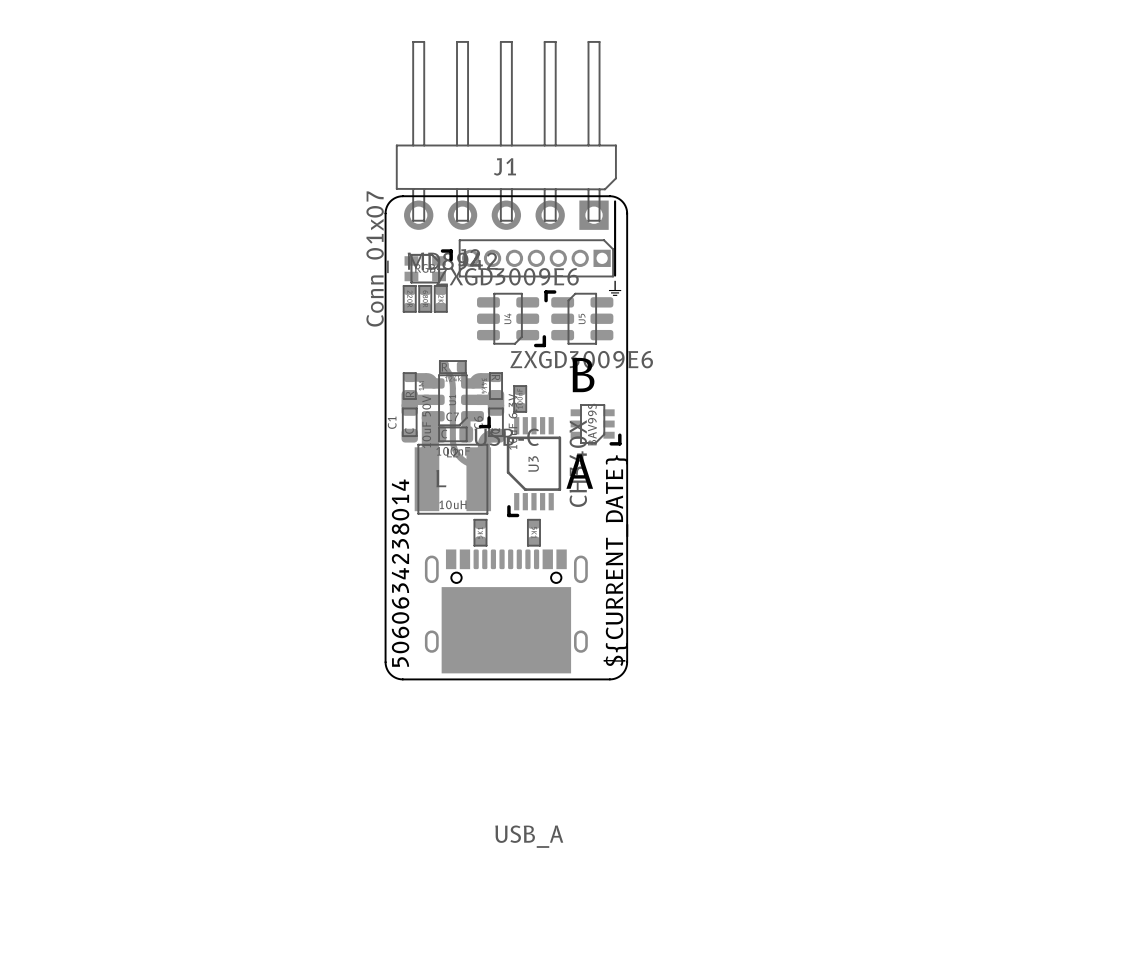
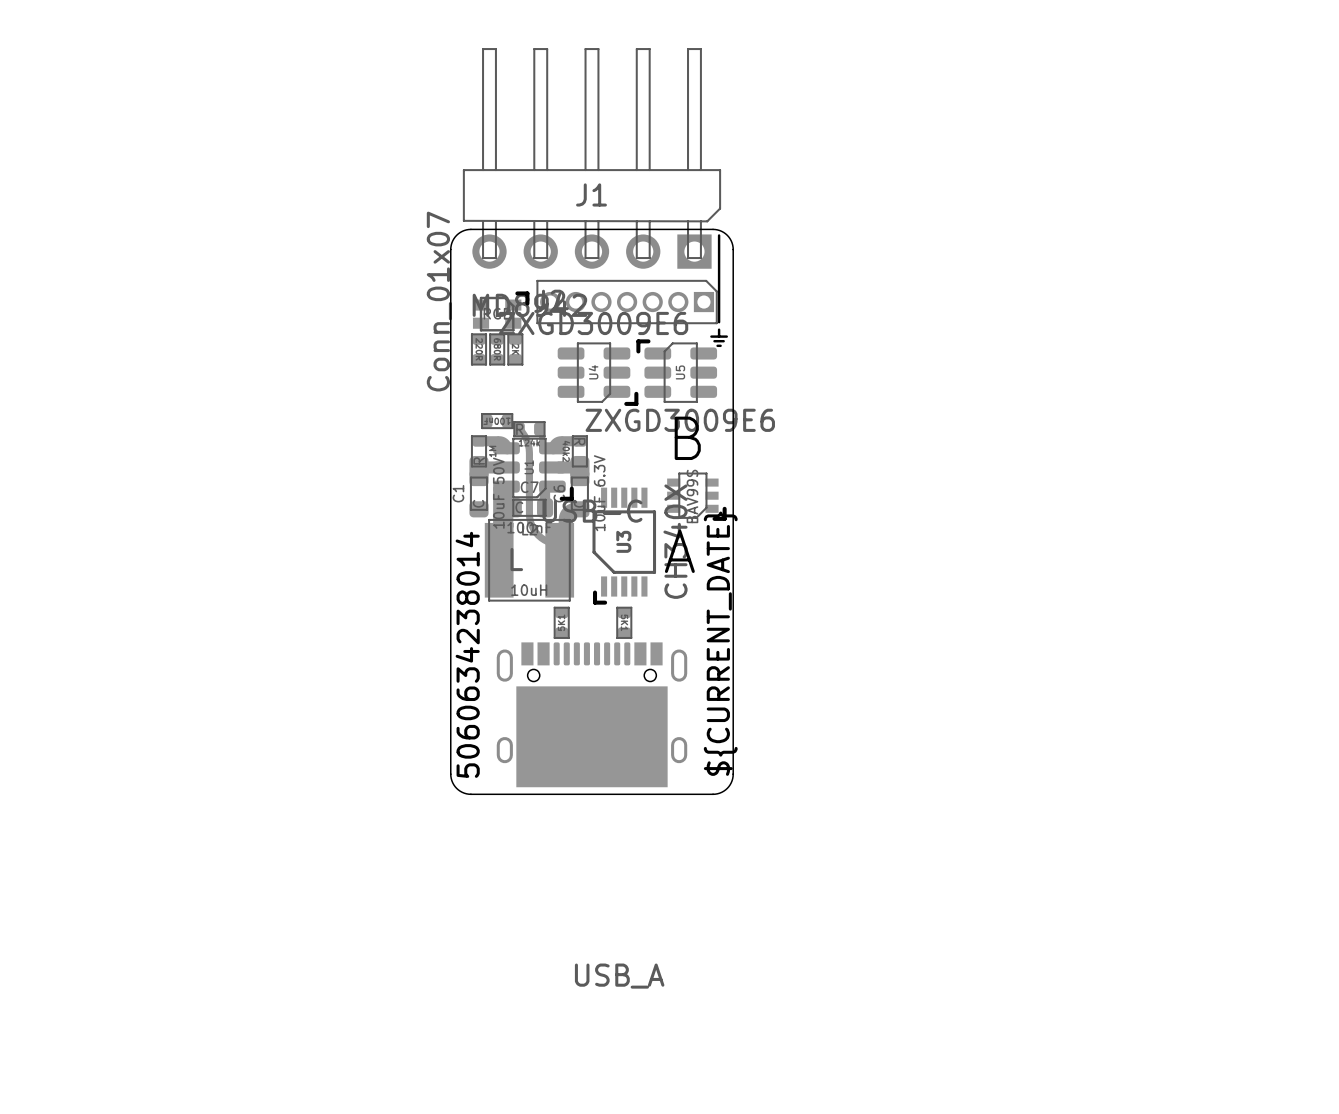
drawing shape: [481, 372, 503, 400] -> [562, 435, 588, 468]
part rotation: 0° (520, 398) -> 90° clockwise (497, 421)
part position: (520, 398) -> (497, 421)

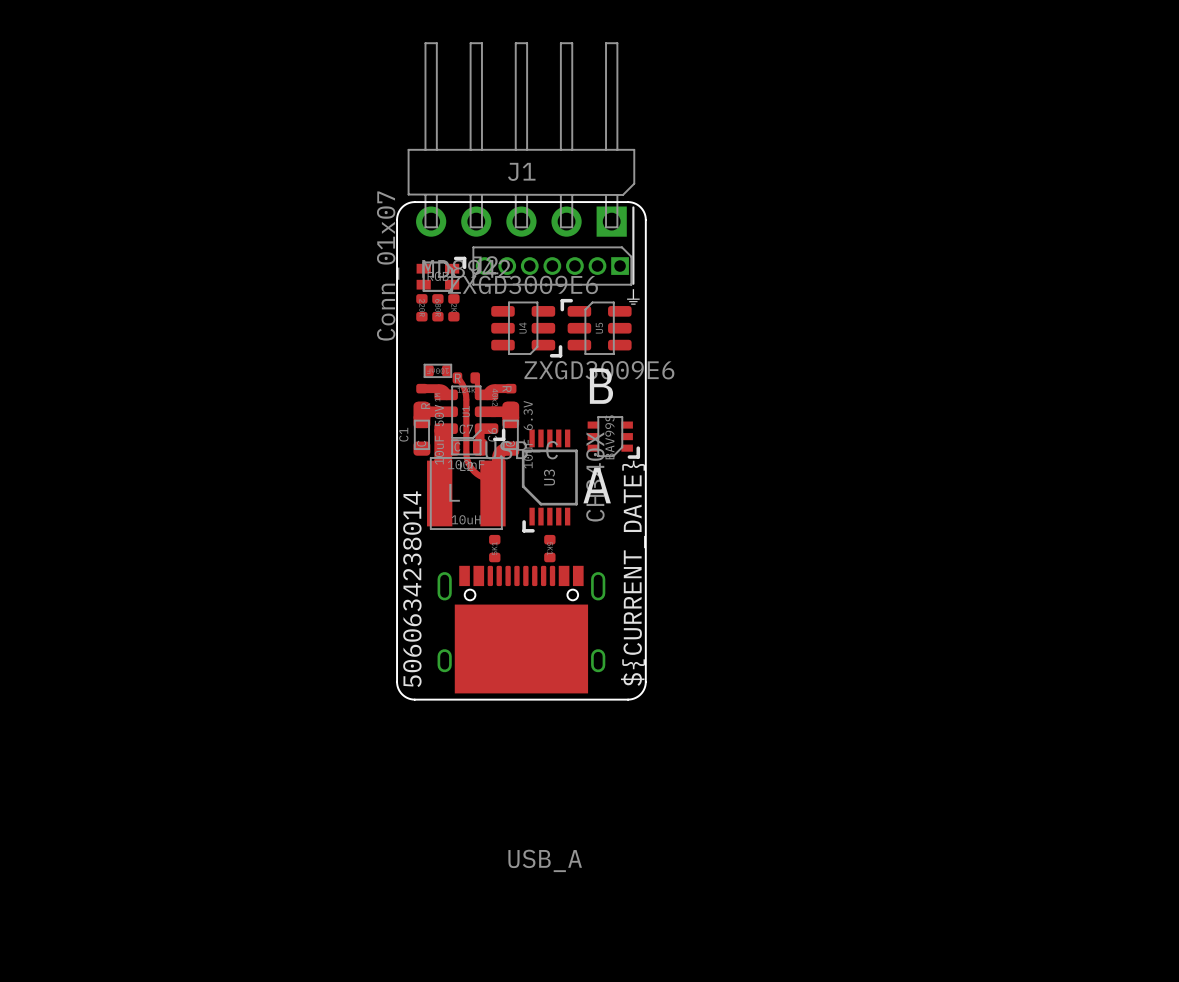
part footprint: [470, 333, 488, 366] -> [416, 294, 428, 322]
part footprint: [489, 333, 506, 366] -> [432, 294, 444, 322]
part footprint: [507, 333, 524, 366] -> [448, 294, 460, 322]
drawing shape: [513, 421, 546, 447] -> [454, 373, 476, 393]
drawing shape: [470, 435, 497, 468] -> [421, 393, 441, 409]
drawing shape: [562, 435, 588, 468] -> [492, 386, 512, 407]
part footprint: [553, 606, 570, 639] -> [489, 534, 501, 563]
part footprint: [616, 606, 633, 639] -> [544, 534, 556, 563]

